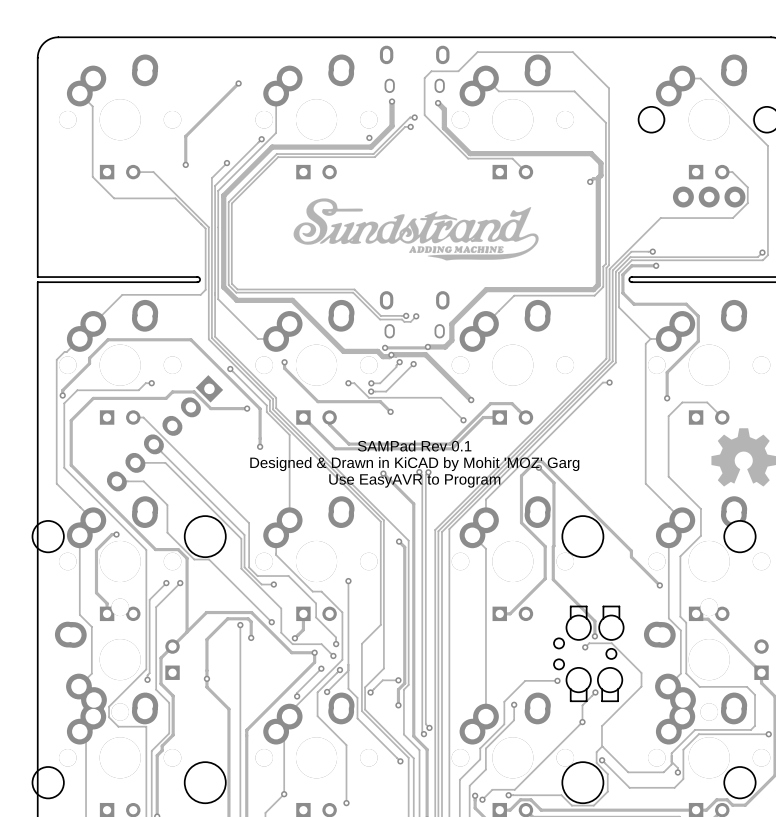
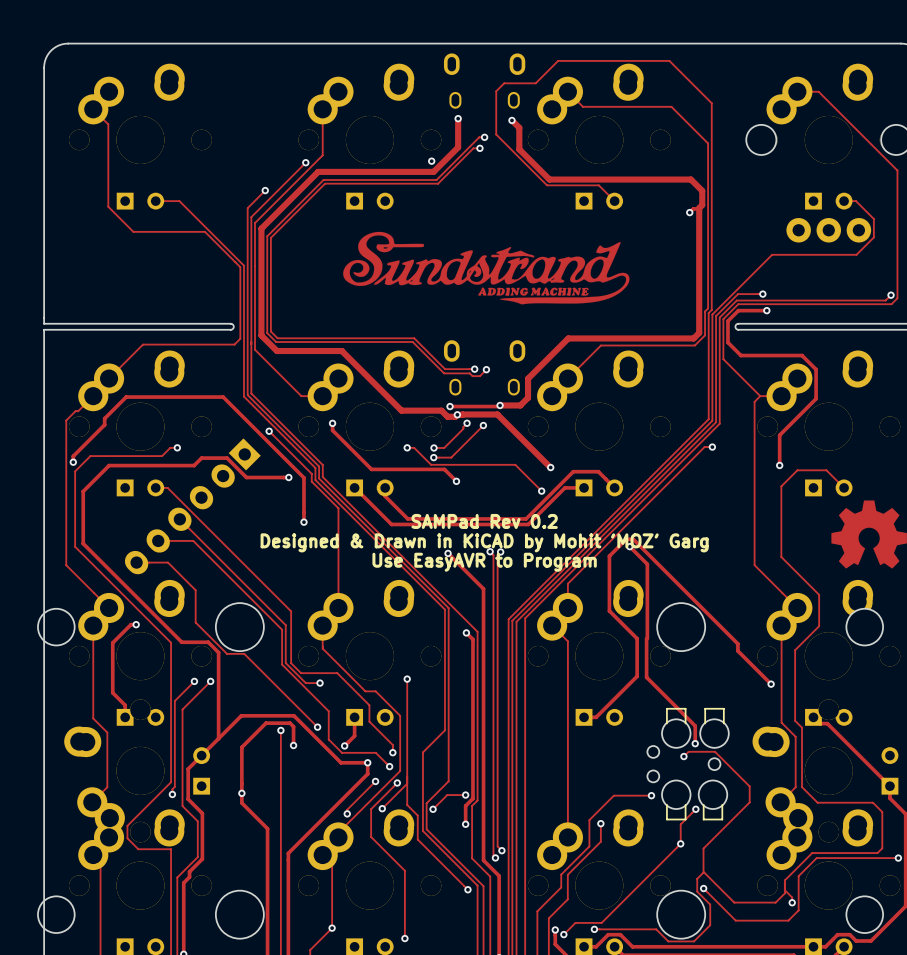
track: (238, 83) (185, 136) (185, 164) -> none
via: (238, 83) -> none
via: (185, 164) -> none
text: SAMPad Rev 0.1 (414, 446) -> SAMPad Rev 0.2 (484, 521)

